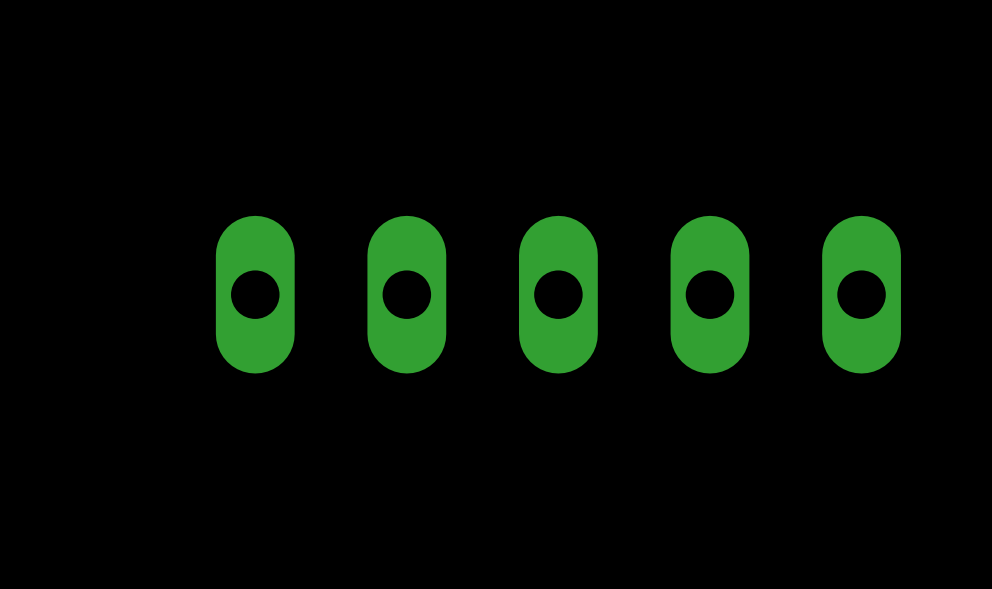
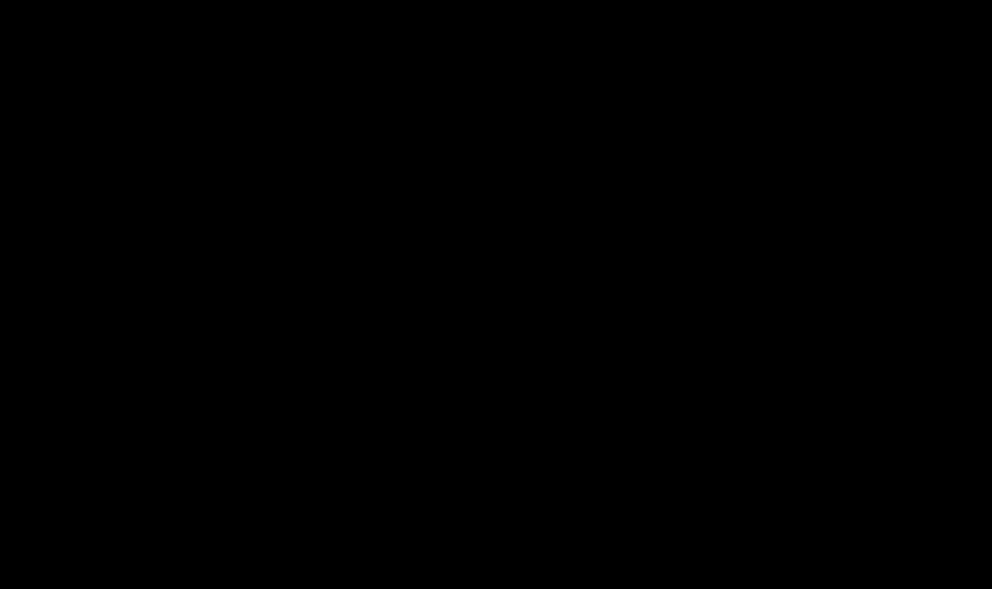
part: (558, 294) -> none

